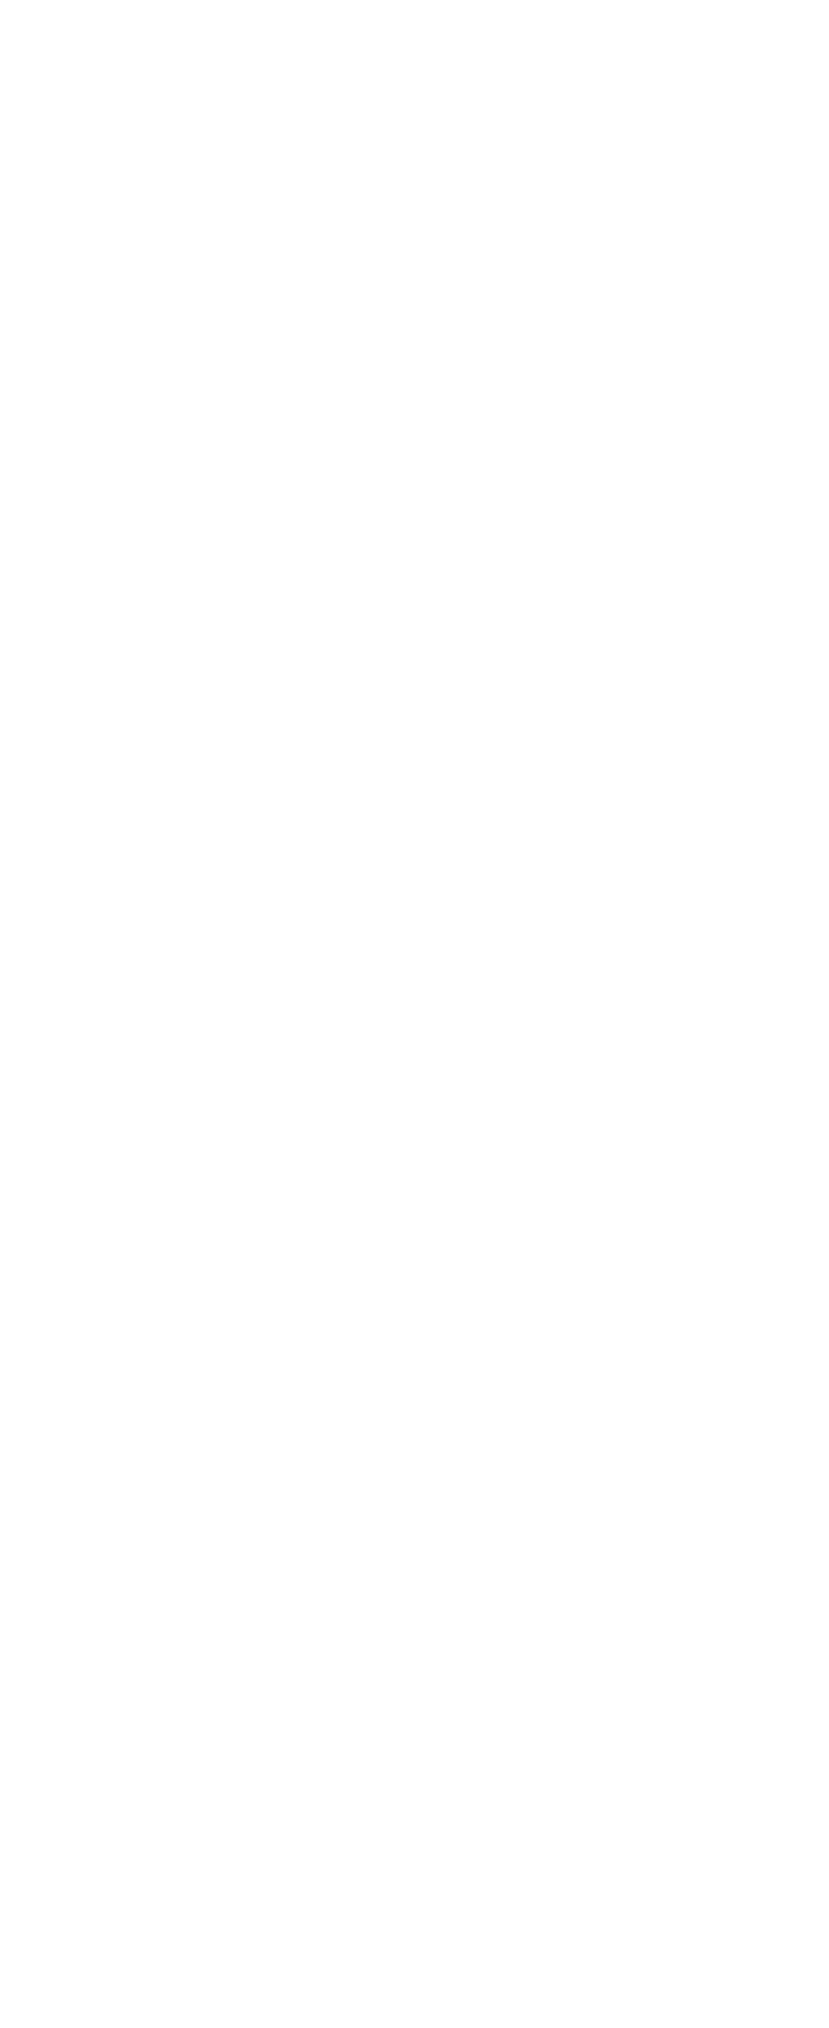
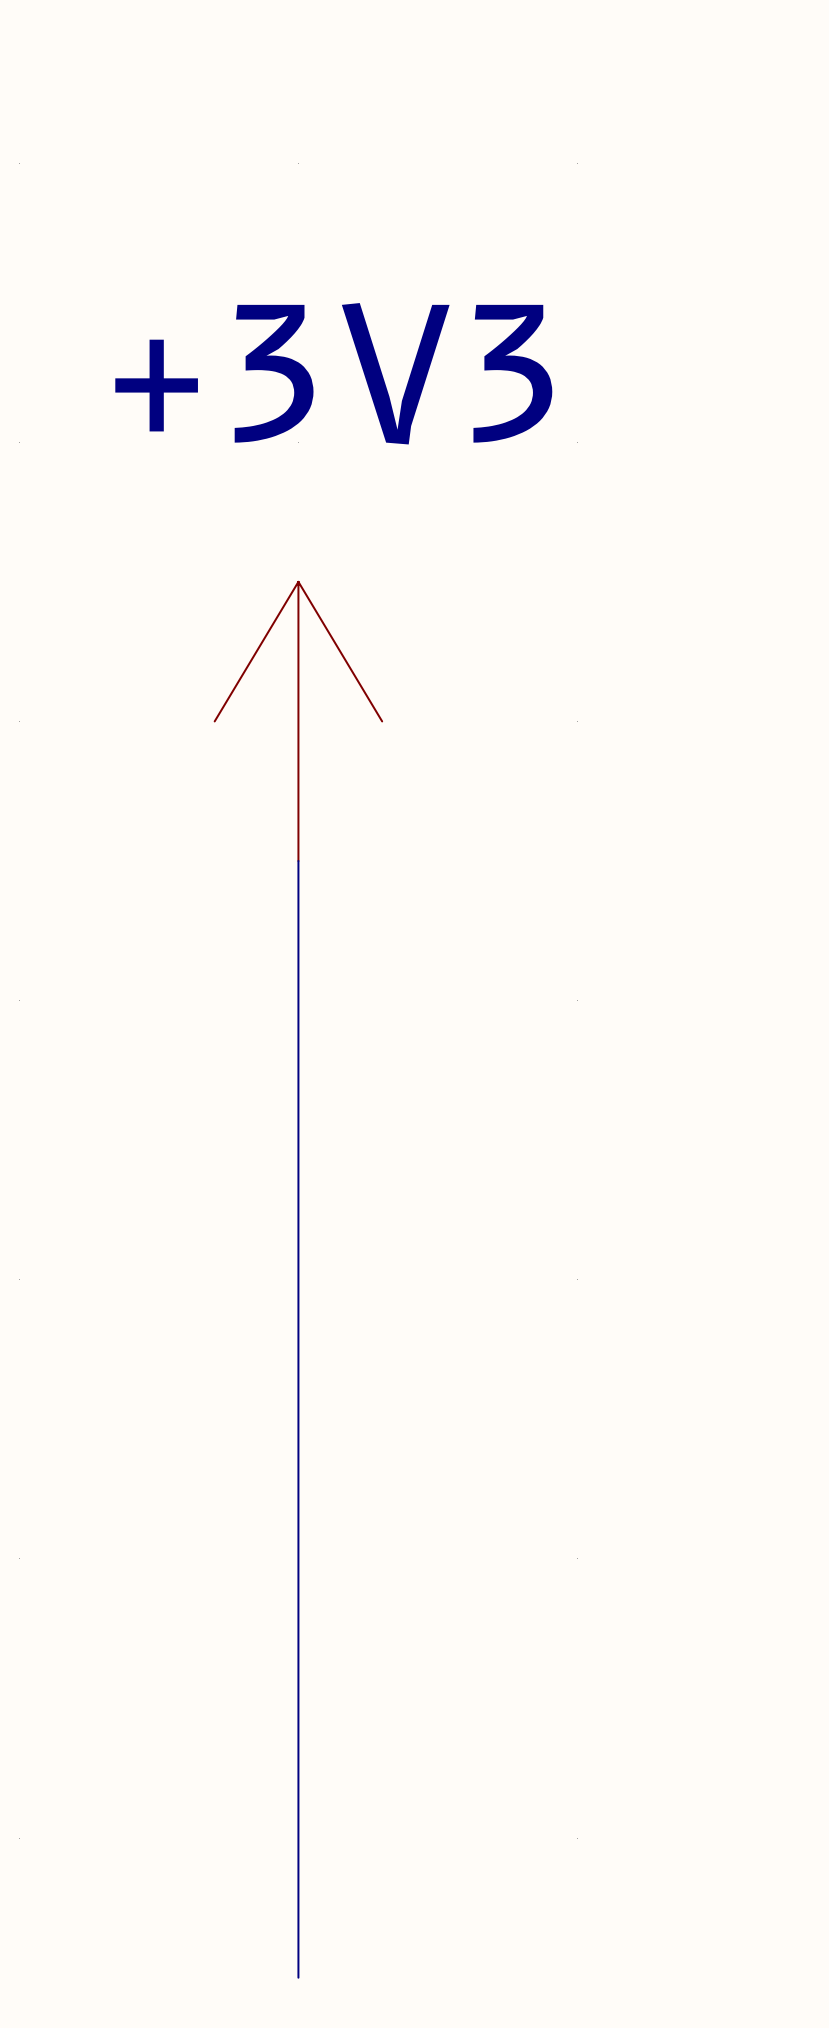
power symbol: none -> +3V3 (298, 721)
wire: none -> (298, 861) (298, 1977)

